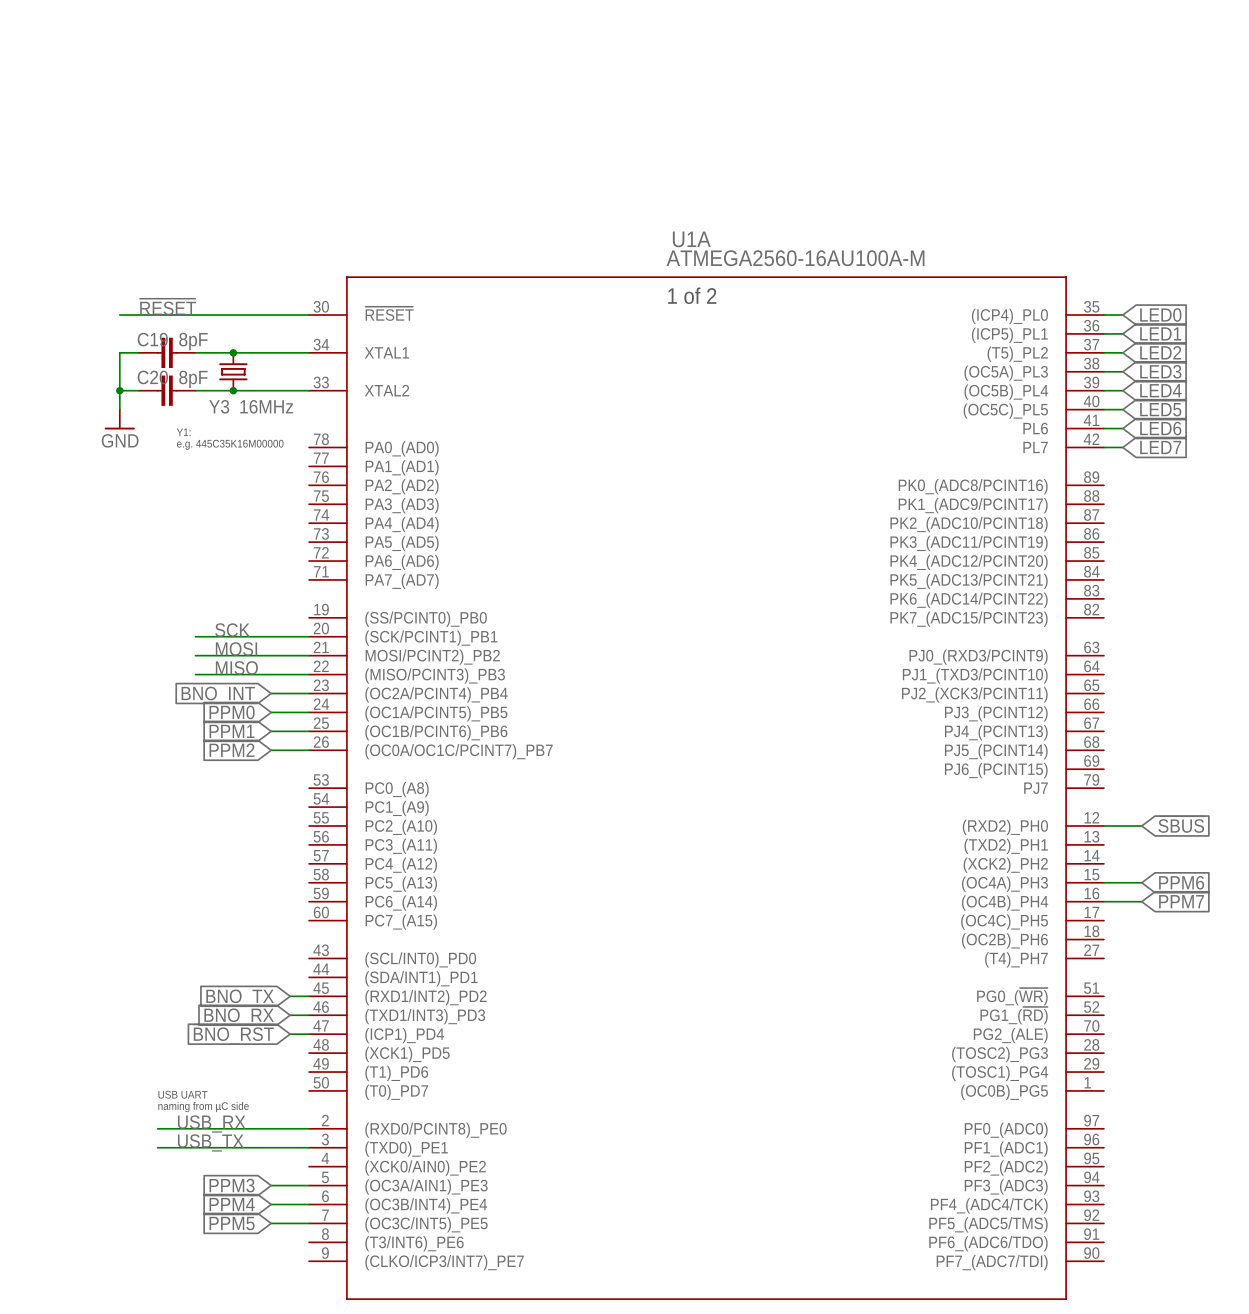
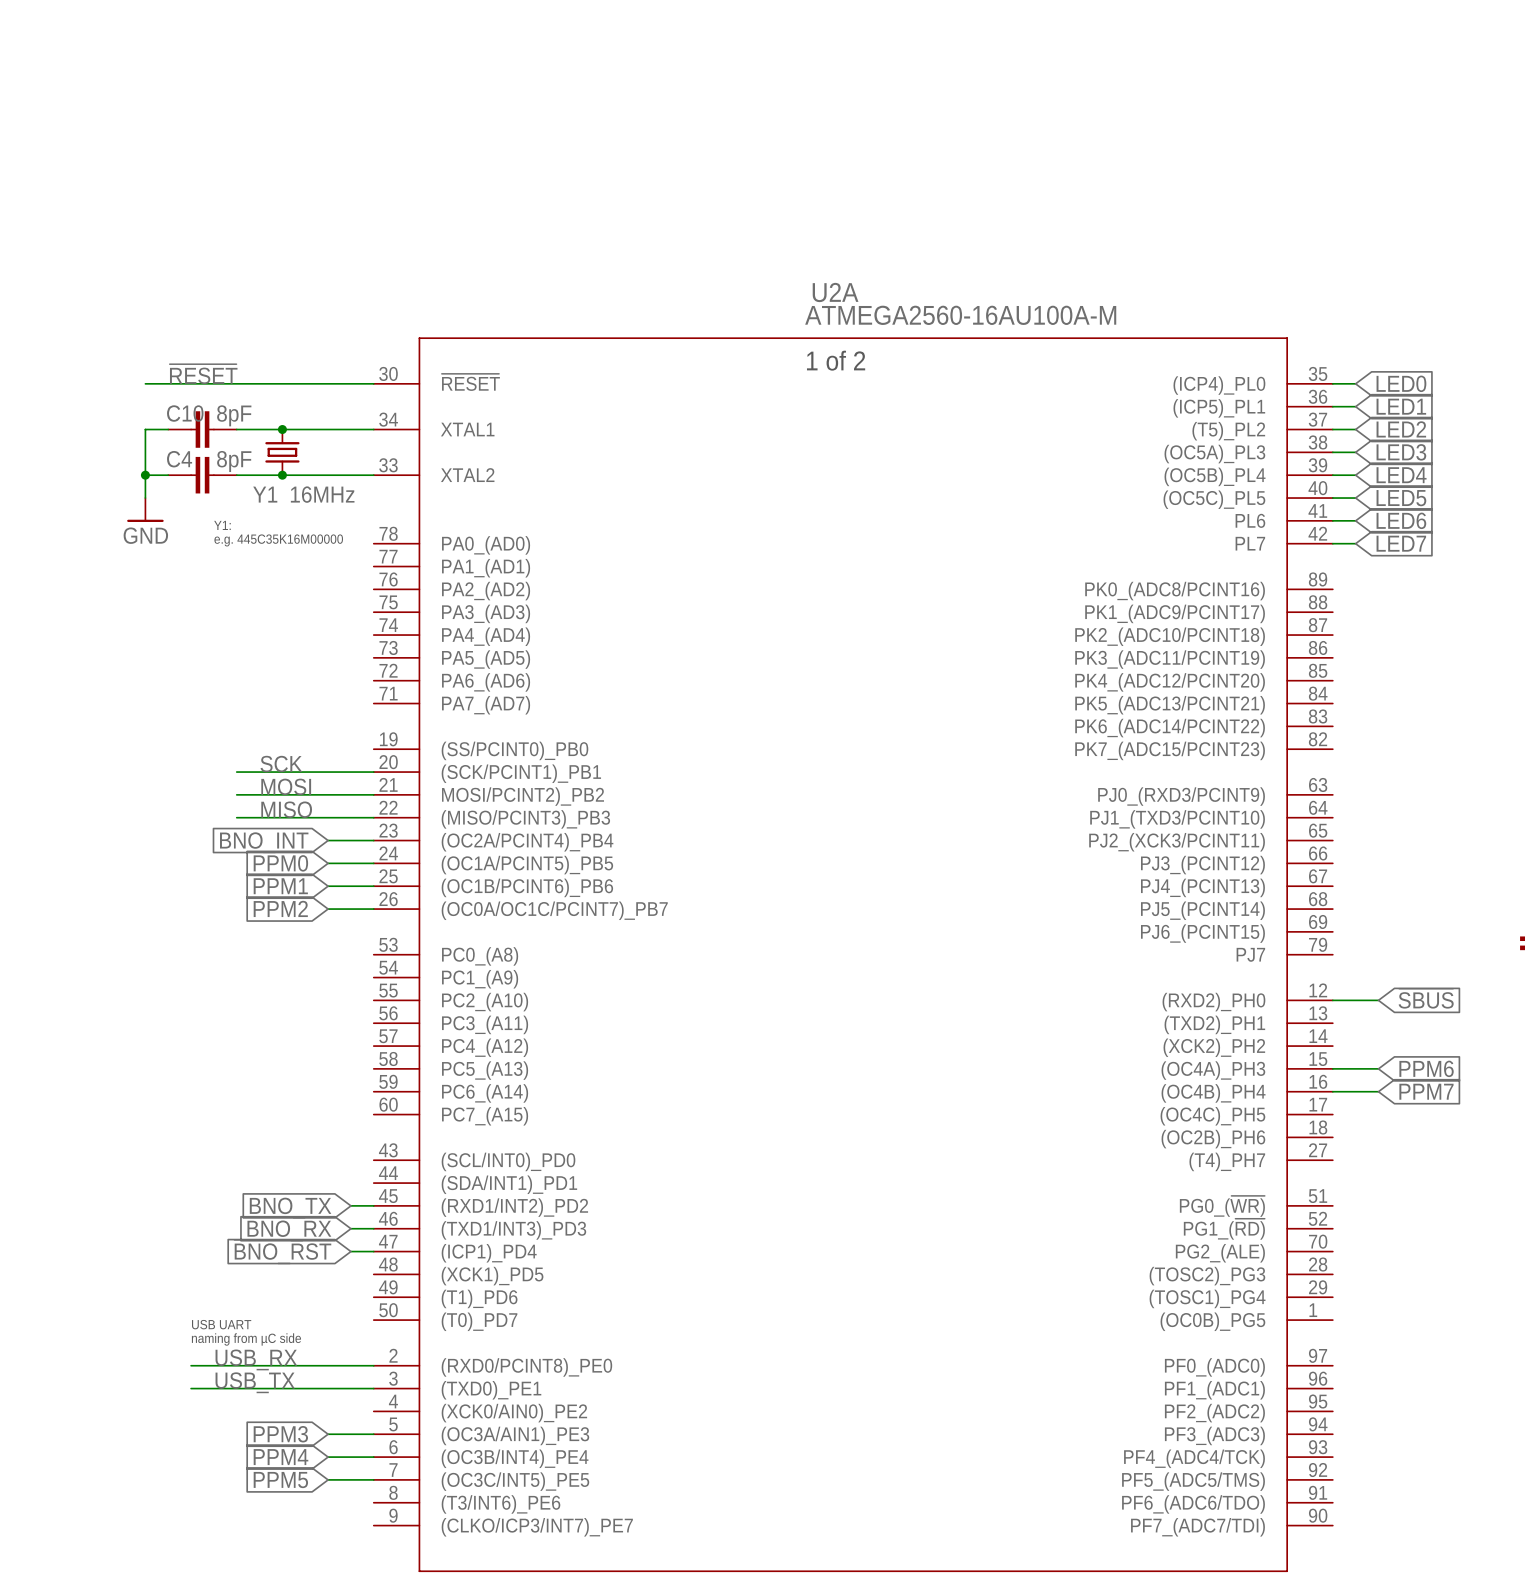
U1A name: U1A (691, 239) -> U2A (835, 292)
C19 name: C19 (152, 339) -> C10 (185, 413)
C20 name: C20 (152, 377) -> C4 (179, 459)
Y3 name: Y3 (219, 406) -> Y1 (265, 494)

